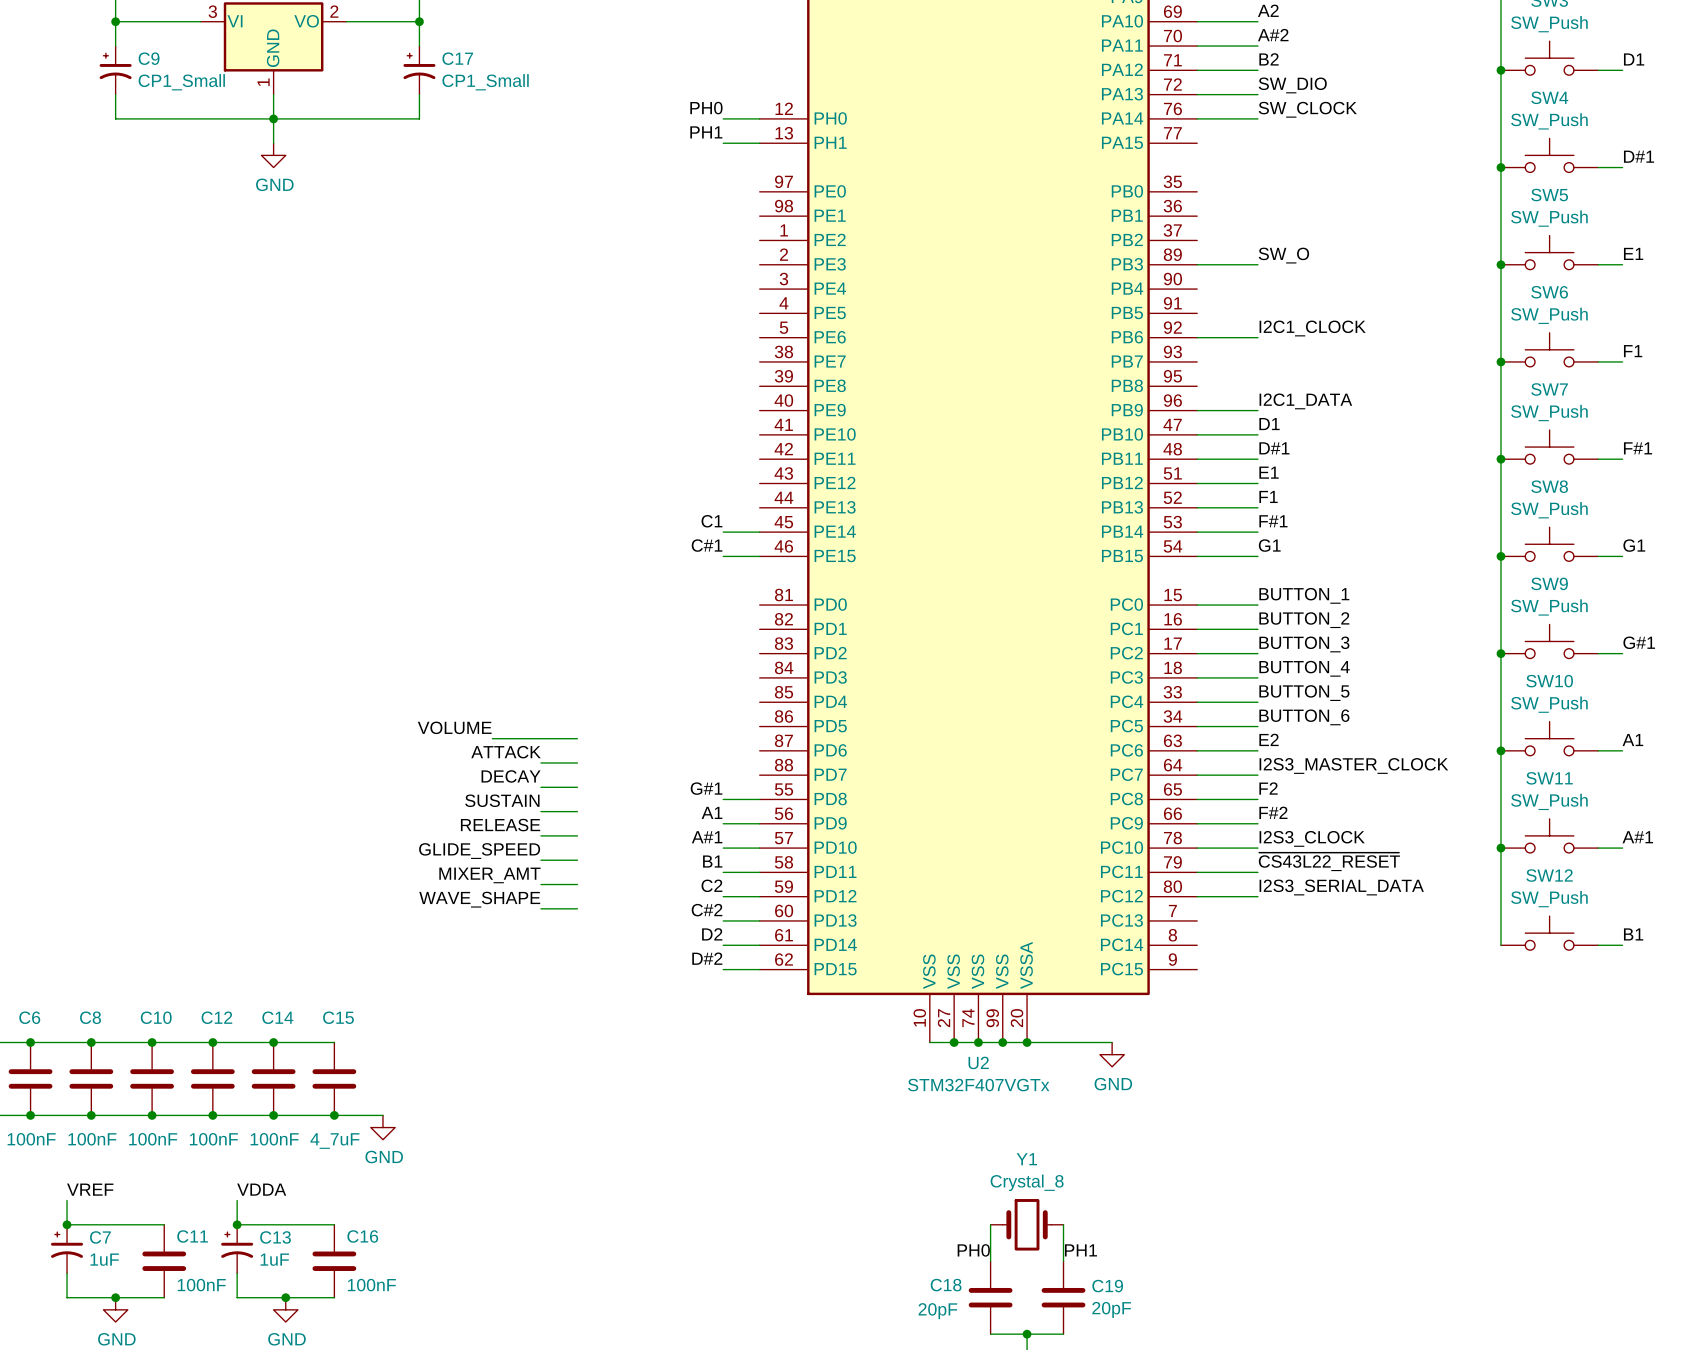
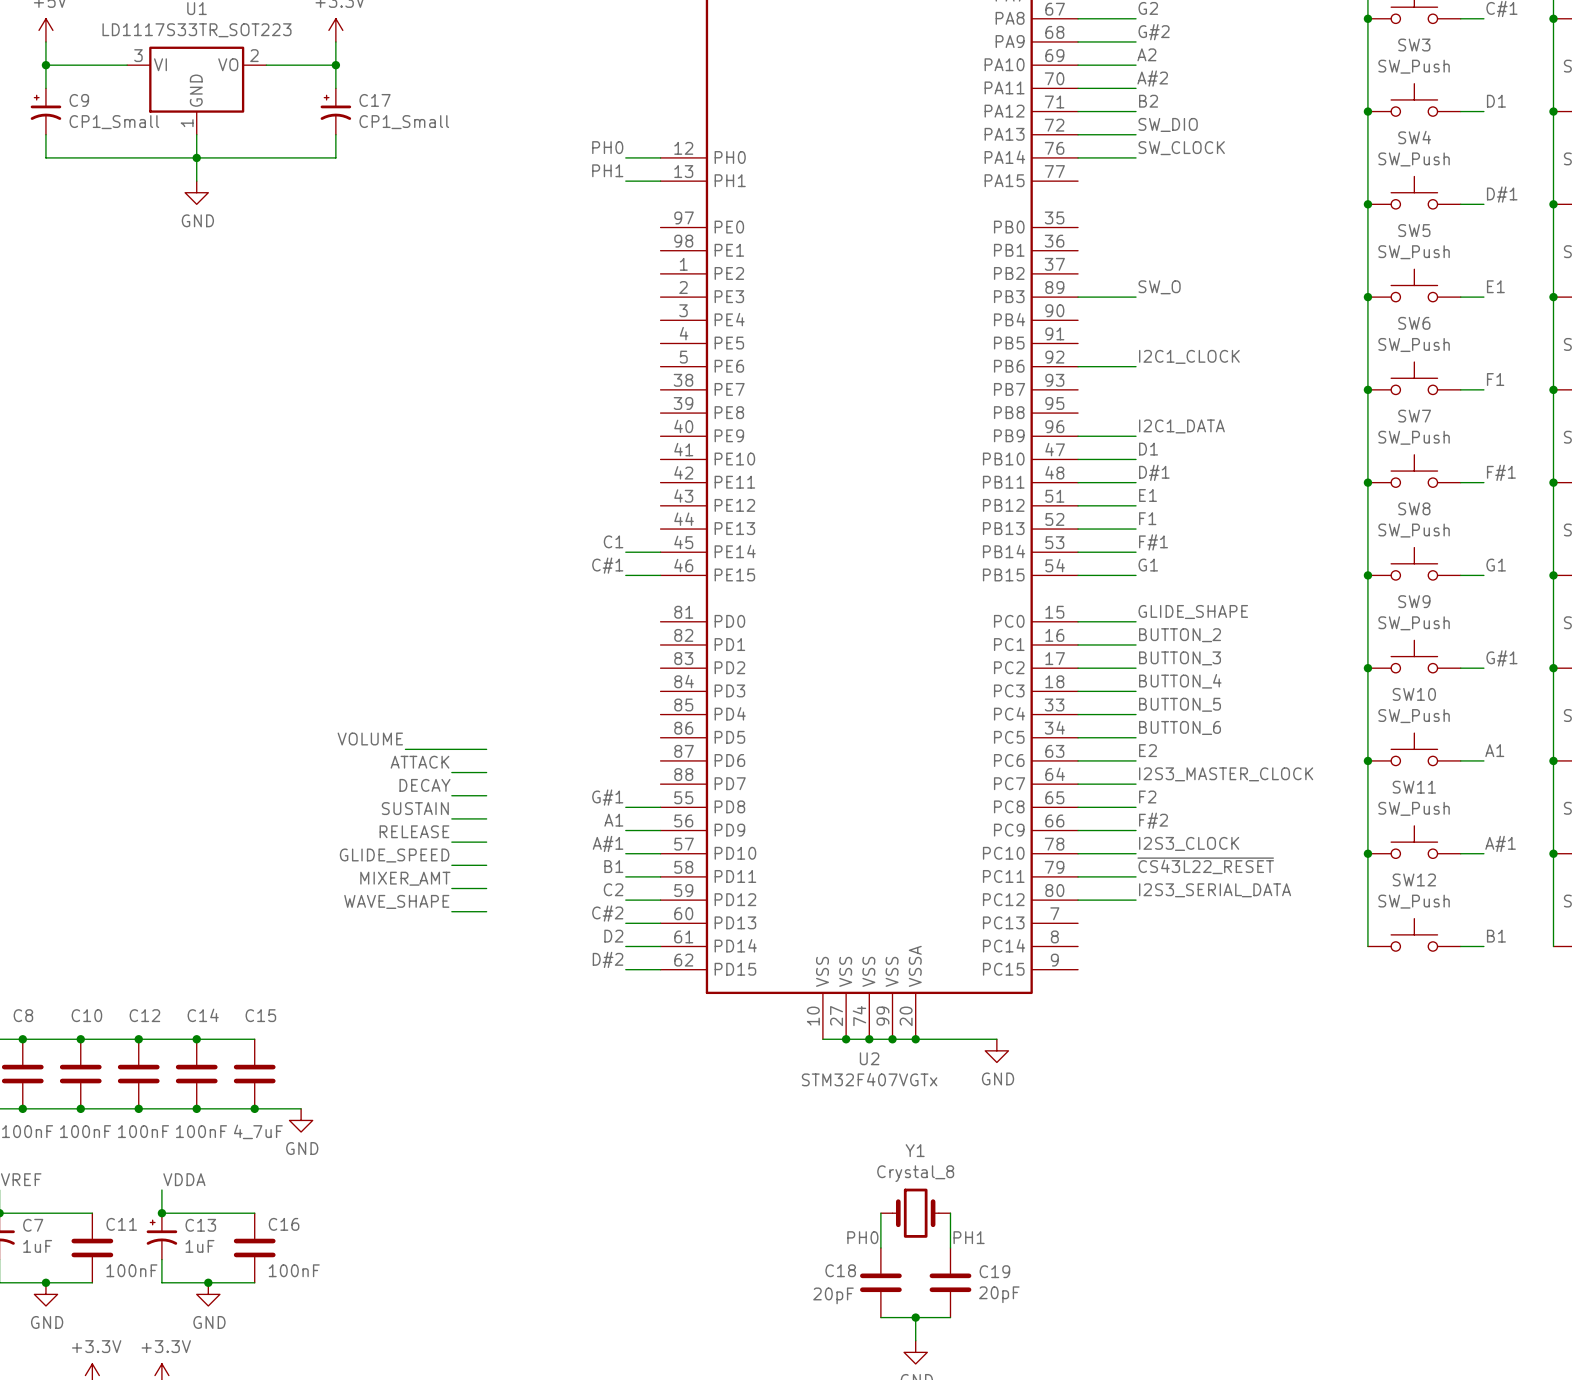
label: BUTTON_1 (1304, 595) -> GLIDE_SHAPE (1193, 612)

